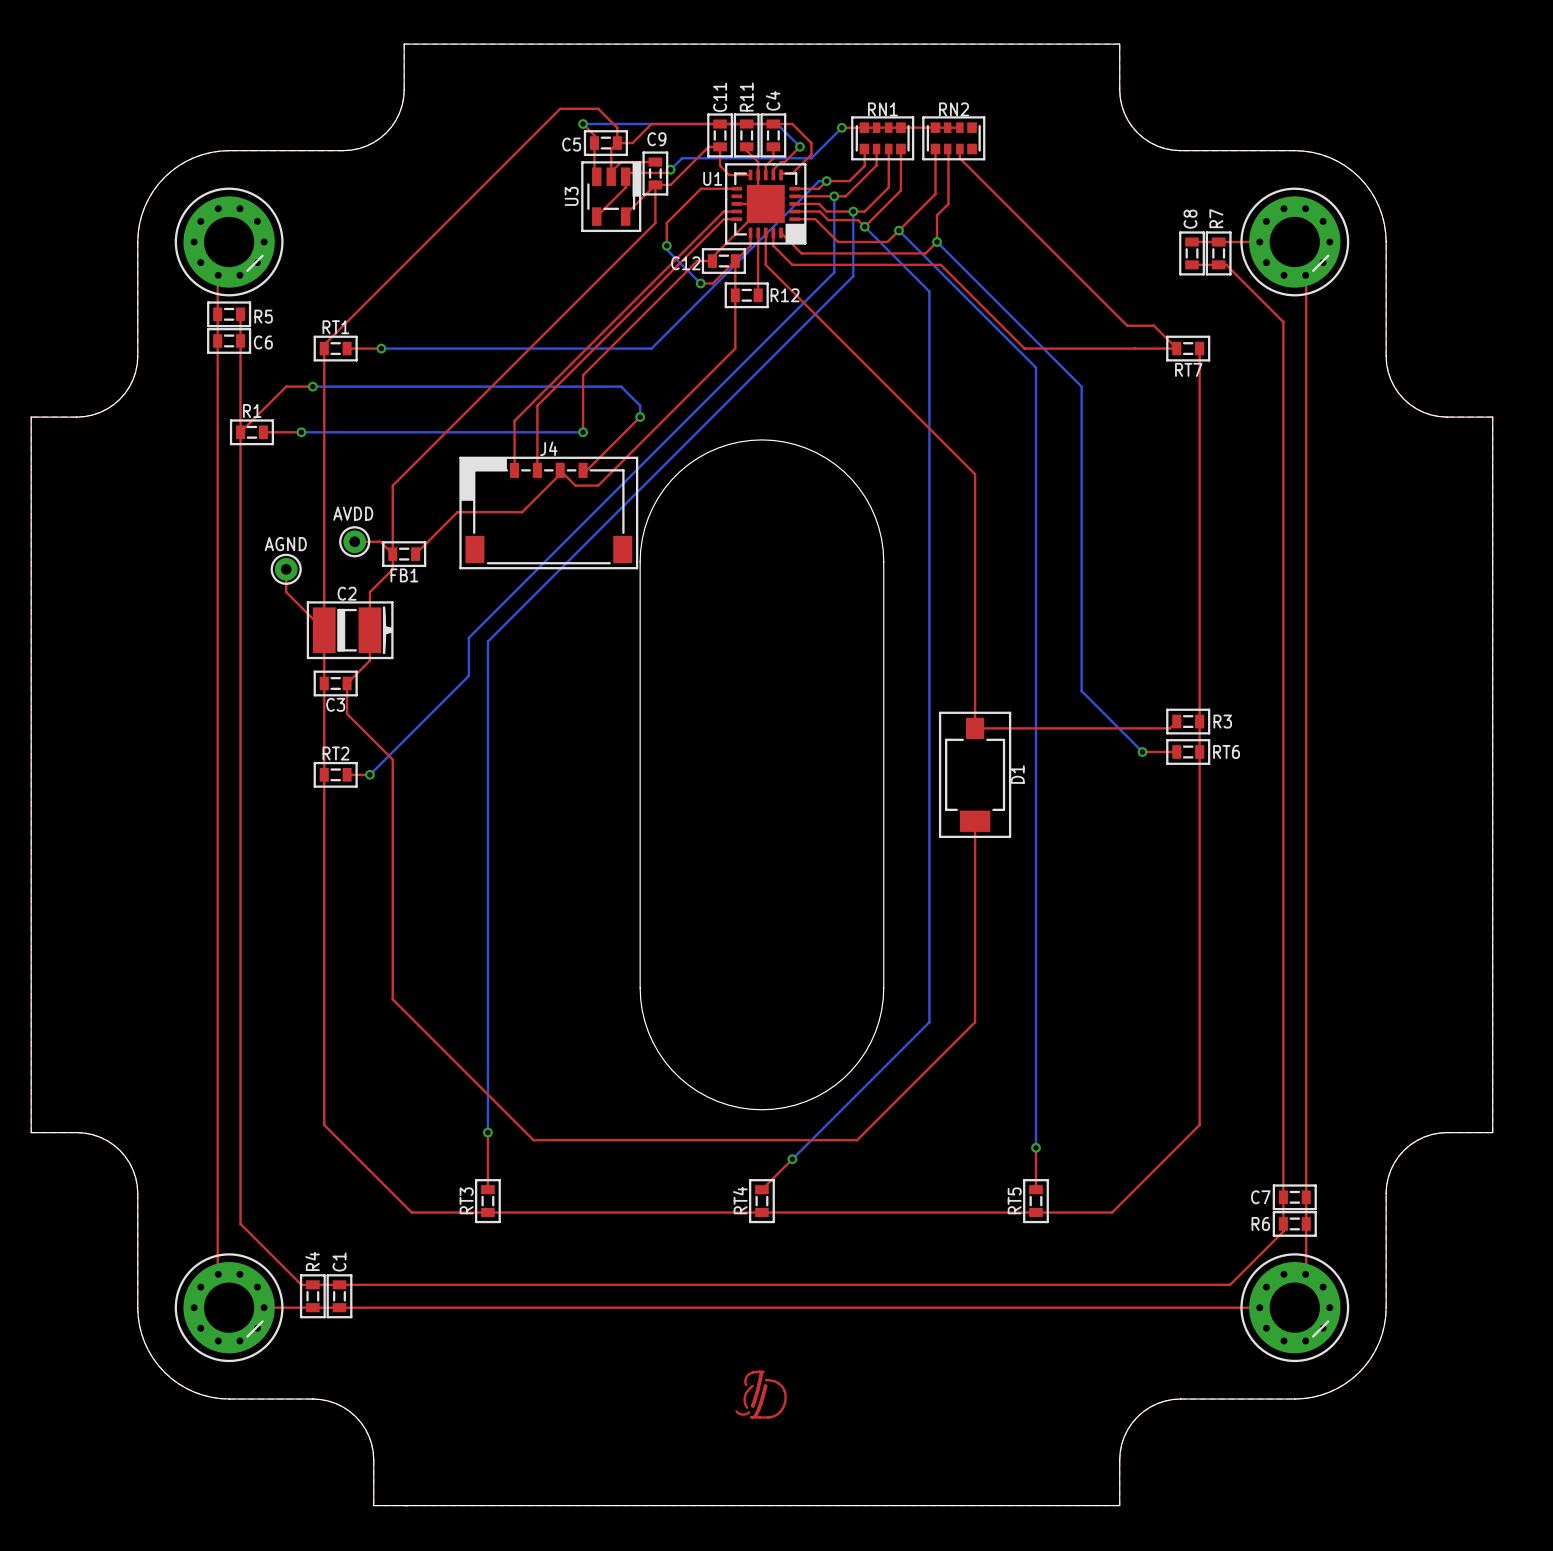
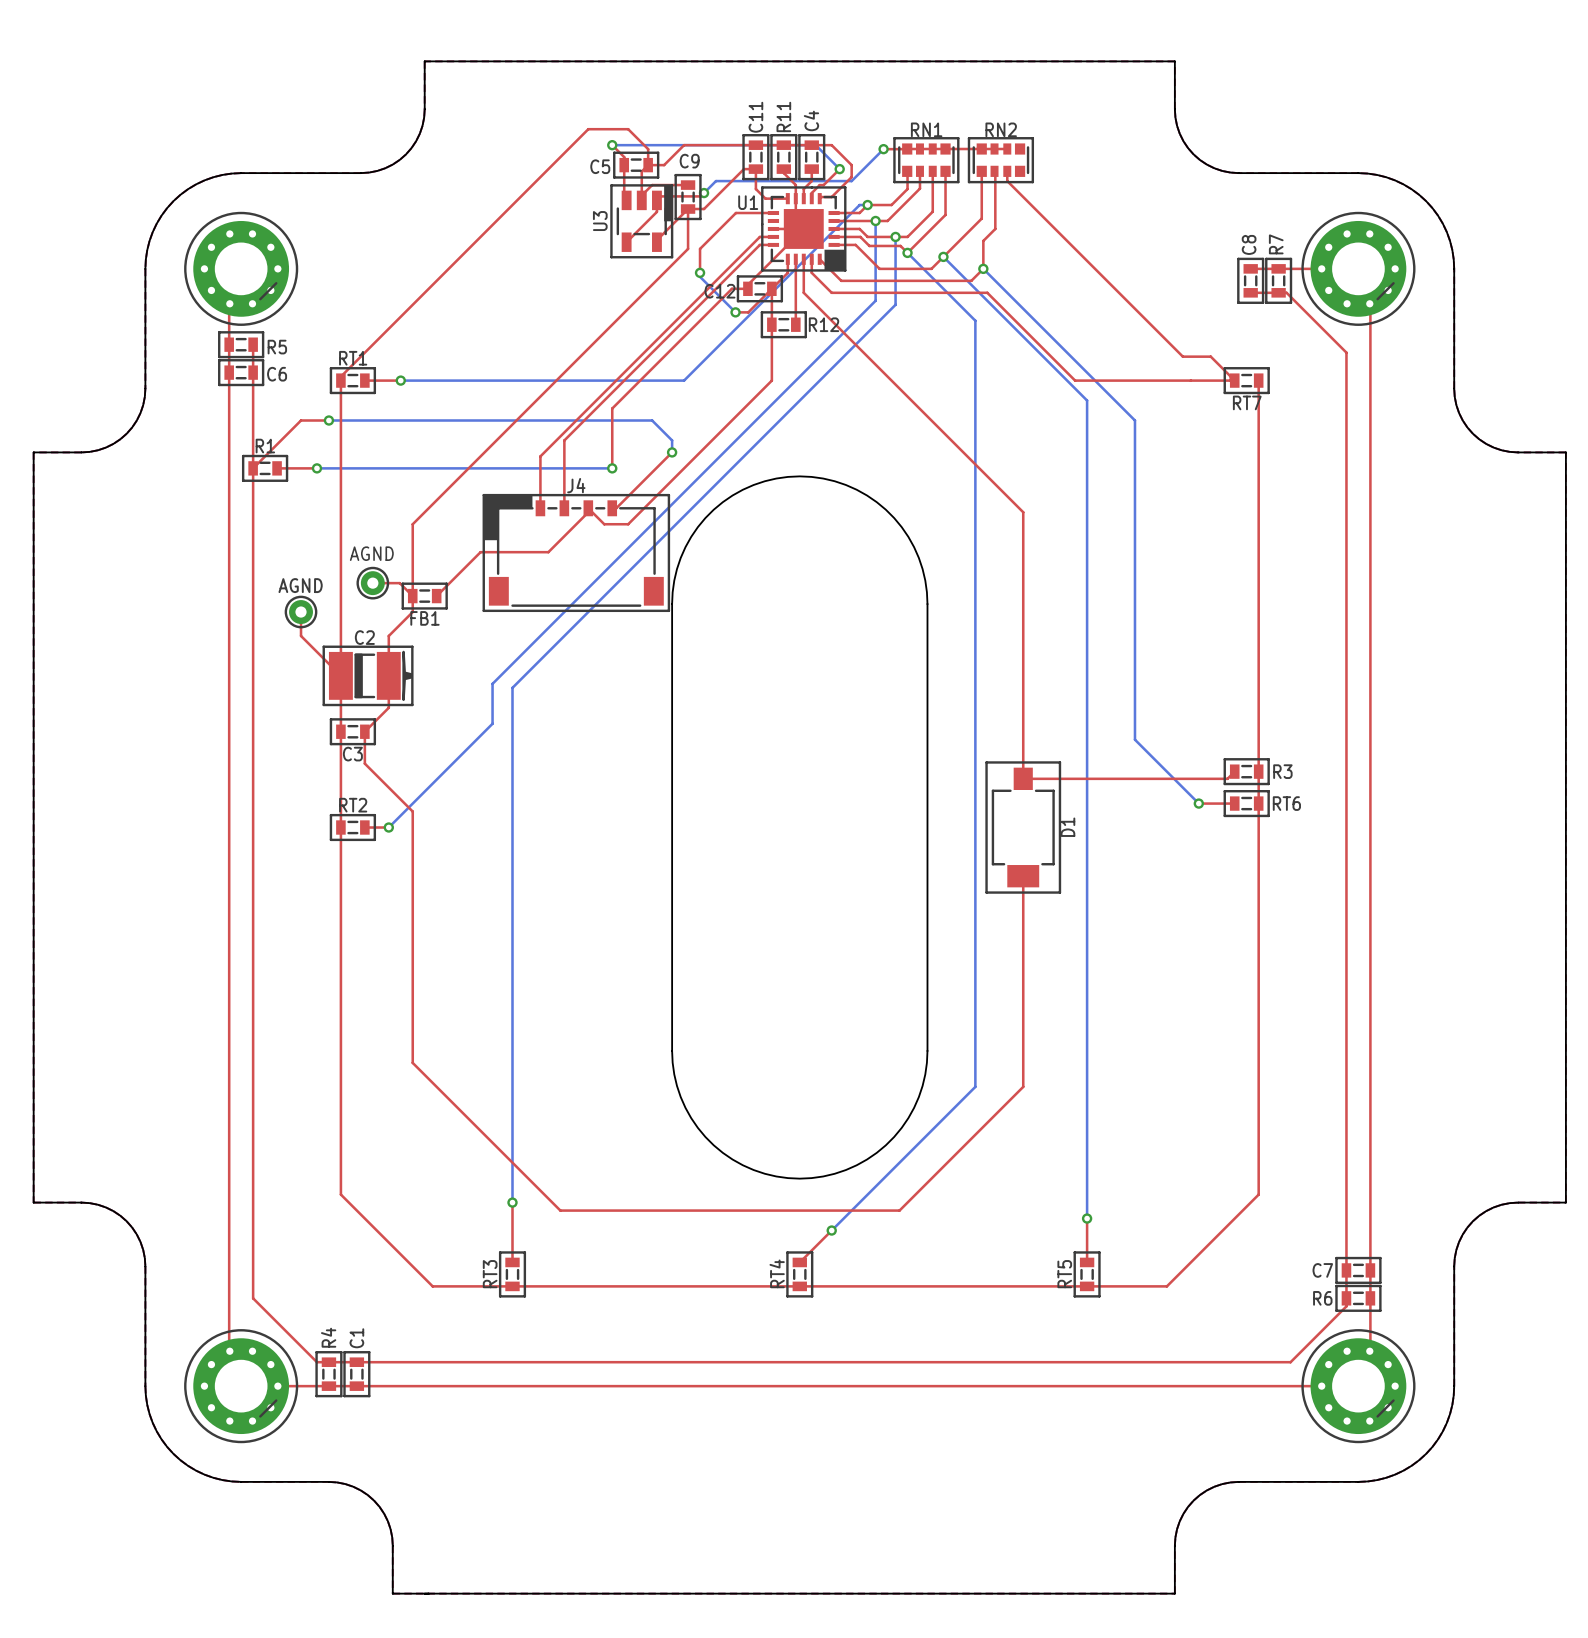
text: AVDD (353, 513) -> AGND (371, 553)
drawing: [735, 1370, 787, 1419] -> none

